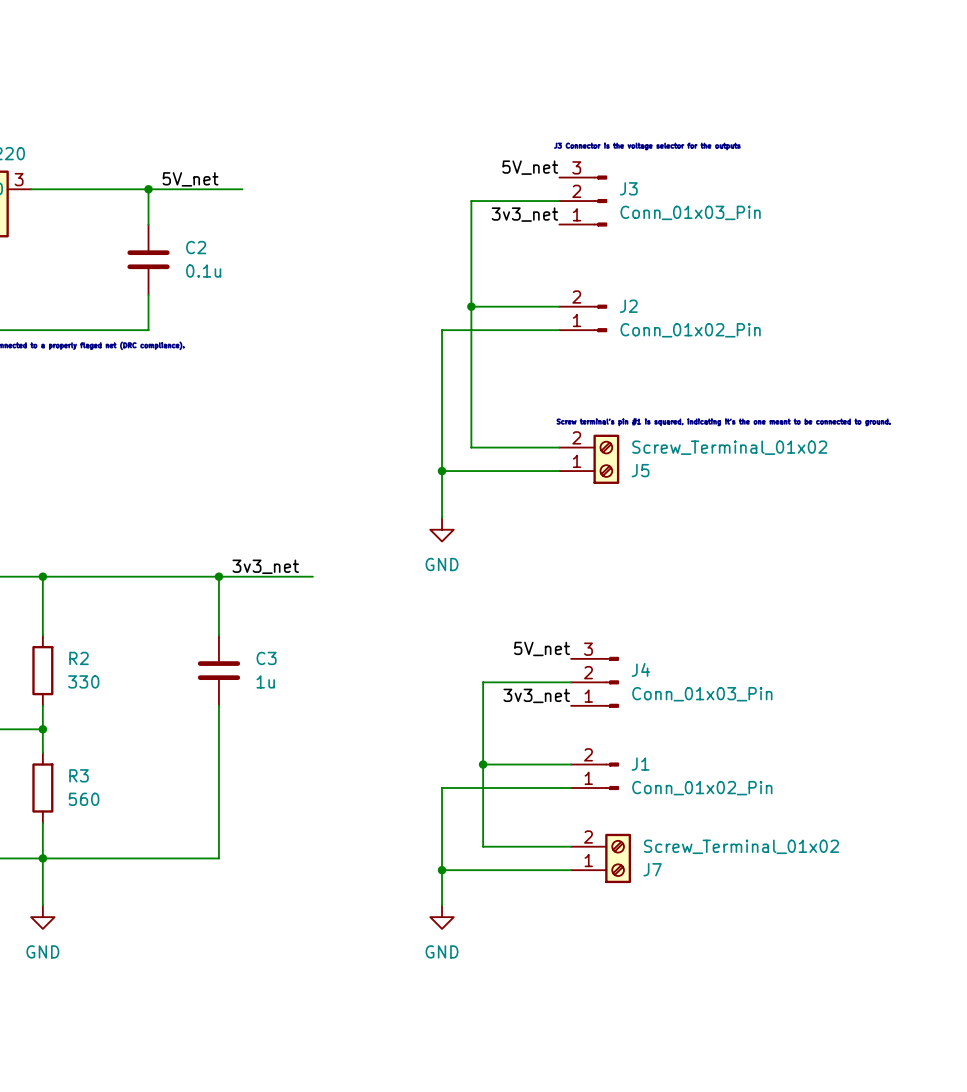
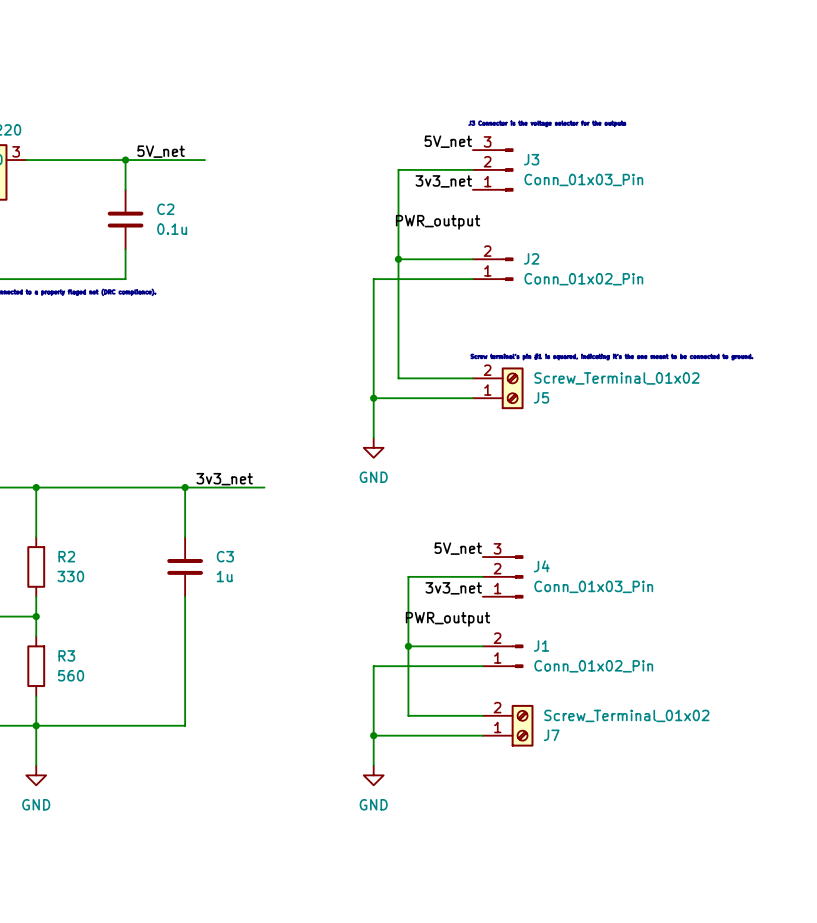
label: none -> PWR_output (438, 222)
label: none -> PWR_output (447, 619)

